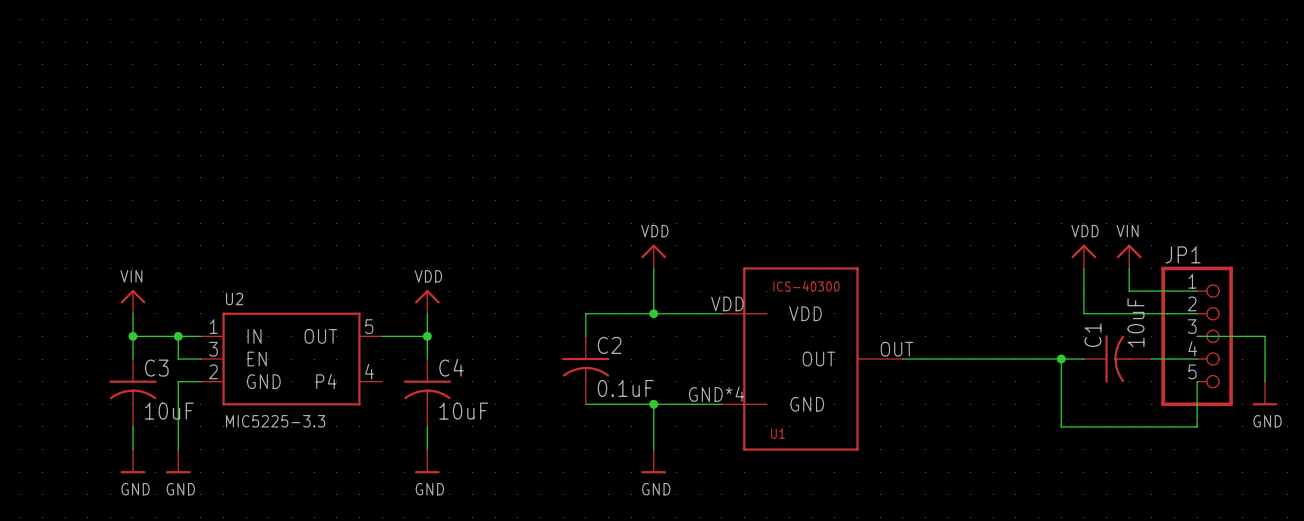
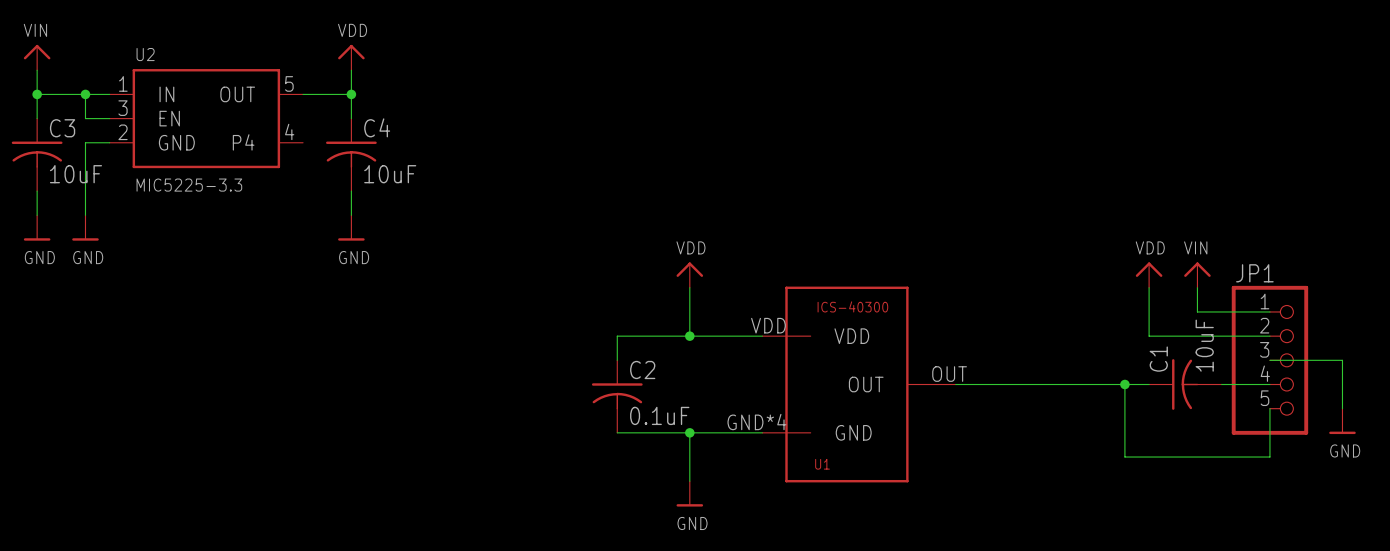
power symbol: none -> VIN (37, 57)
power symbol: none -> VDD (351, 57)
wire: none -> (37, 70) (37, 118)
wire: none -> (351, 70) (351, 118)
wire: none -> (37, 94) (109, 94)
junction: none -> (37, 94)
wire: none -> (85, 94) (85, 118) (109, 118)
junction: none -> (85, 94)
wire: none -> (303, 94) (351, 94)
junction: none -> (351, 94)
wire: none -> (109, 142) (85, 142) (85, 215)
wire: none -> (37, 191) (37, 215)
wire: none -> (351, 191) (351, 215)
power symbol: none -> GND (37, 227)
power symbol: none -> GND (85, 227)
power symbol: none -> GND (351, 227)
power symbol: VIN (132, 301) -> none
power symbol: VDD (427, 301) -> none
wire: (132, 313) (132, 359) -> none
wire: (427, 313) (427, 359) -> none
wire: (132, 336) (200, 336) -> none
junction: (132, 336) -> none
wire: (178, 336) (178, 359) (200, 359) -> none
junction: (178, 336) -> none
wire: (382, 336) (427, 336) -> none
junction: (427, 336) -> none
U2 position: (291, 359) -> (206, 118)
wire: (200, 381) (178, 381) (178, 449) -> none
C3 position: (132, 392) -> (37, 154)
C4 position: (427, 392) -> (351, 154)
wire: (132, 426) (132, 449) -> none
wire: (427, 426) (427, 449) -> none
power symbol: GND (132, 461) -> none
power symbol: GND (178, 461) -> none
power symbol: GND (427, 461) -> none

